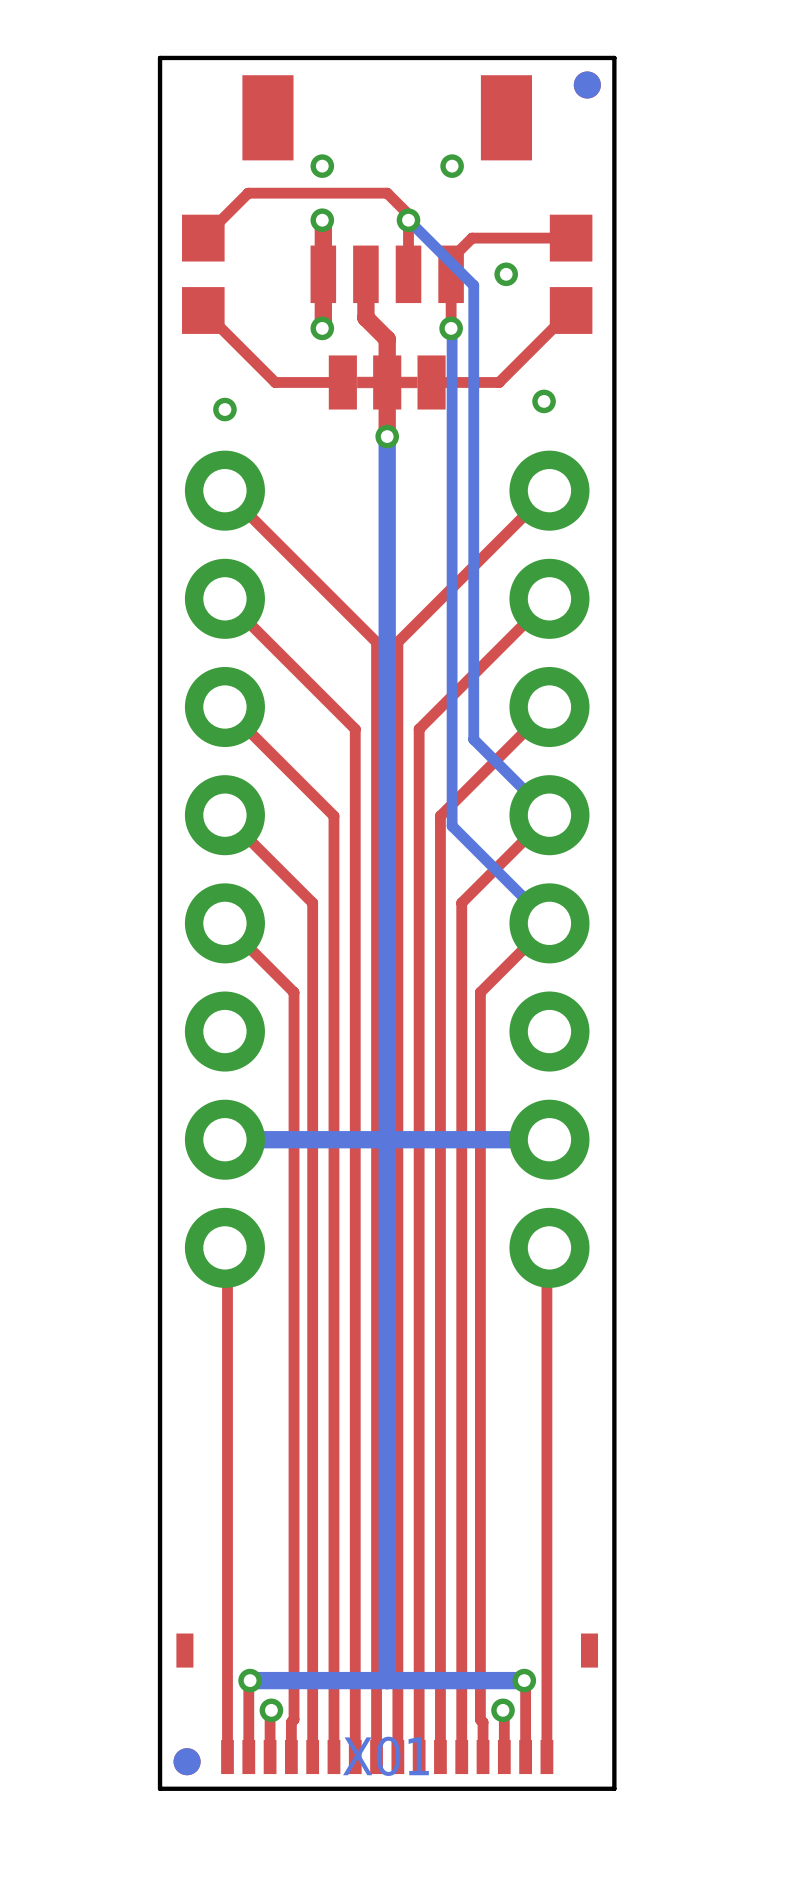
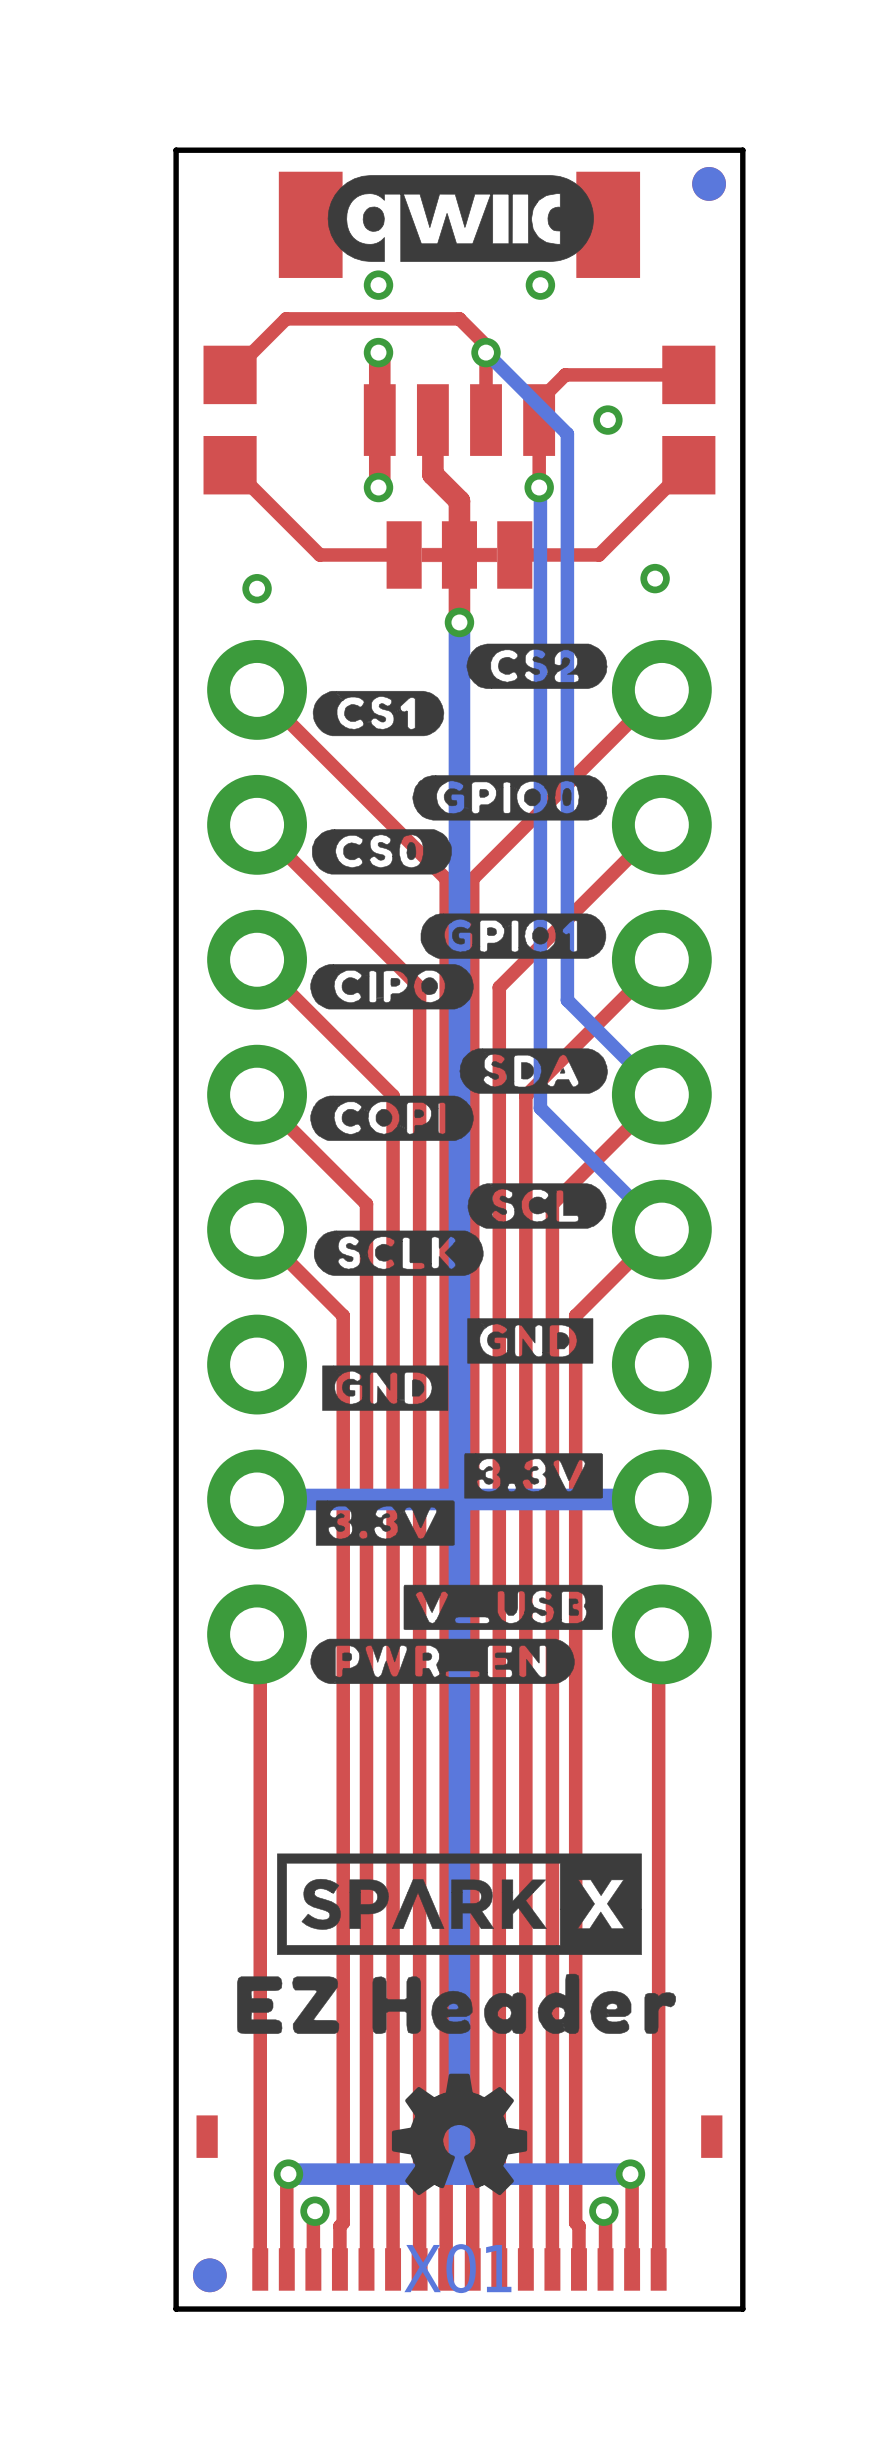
drawing: none -> [327, 175, 594, 262]
drawing: none -> [310, 643, 608, 1684]
drawing: none -> [237, 1853, 676, 2196]

